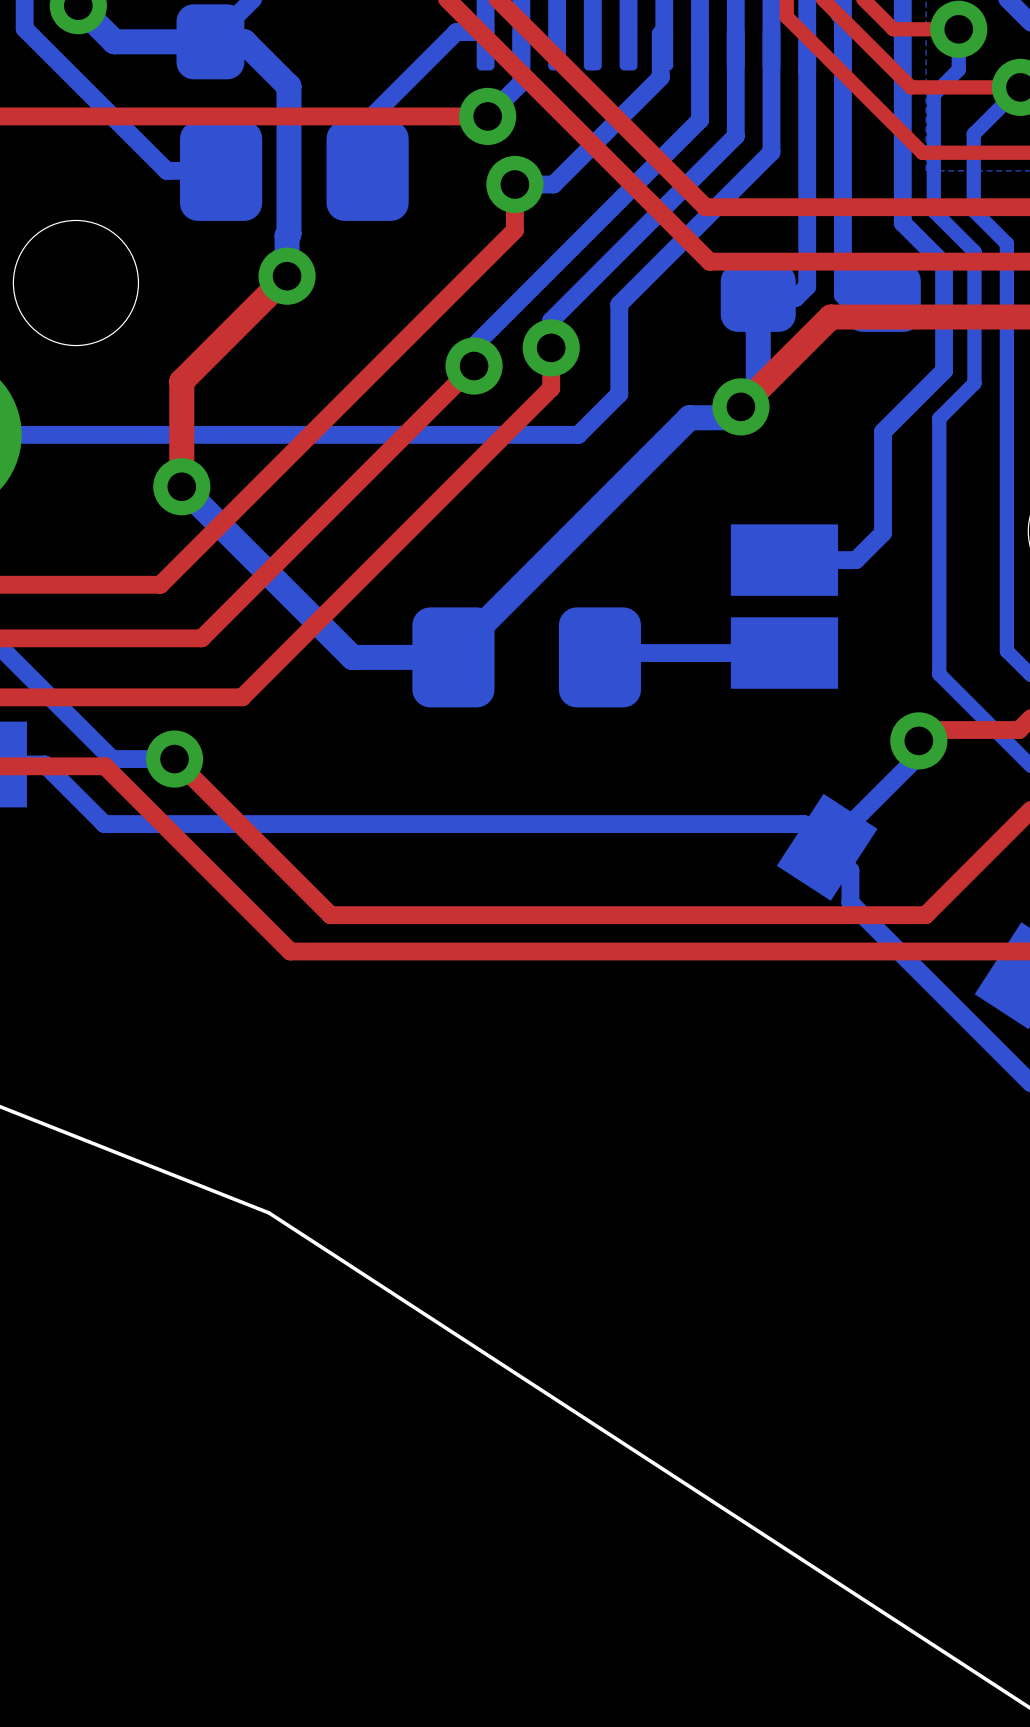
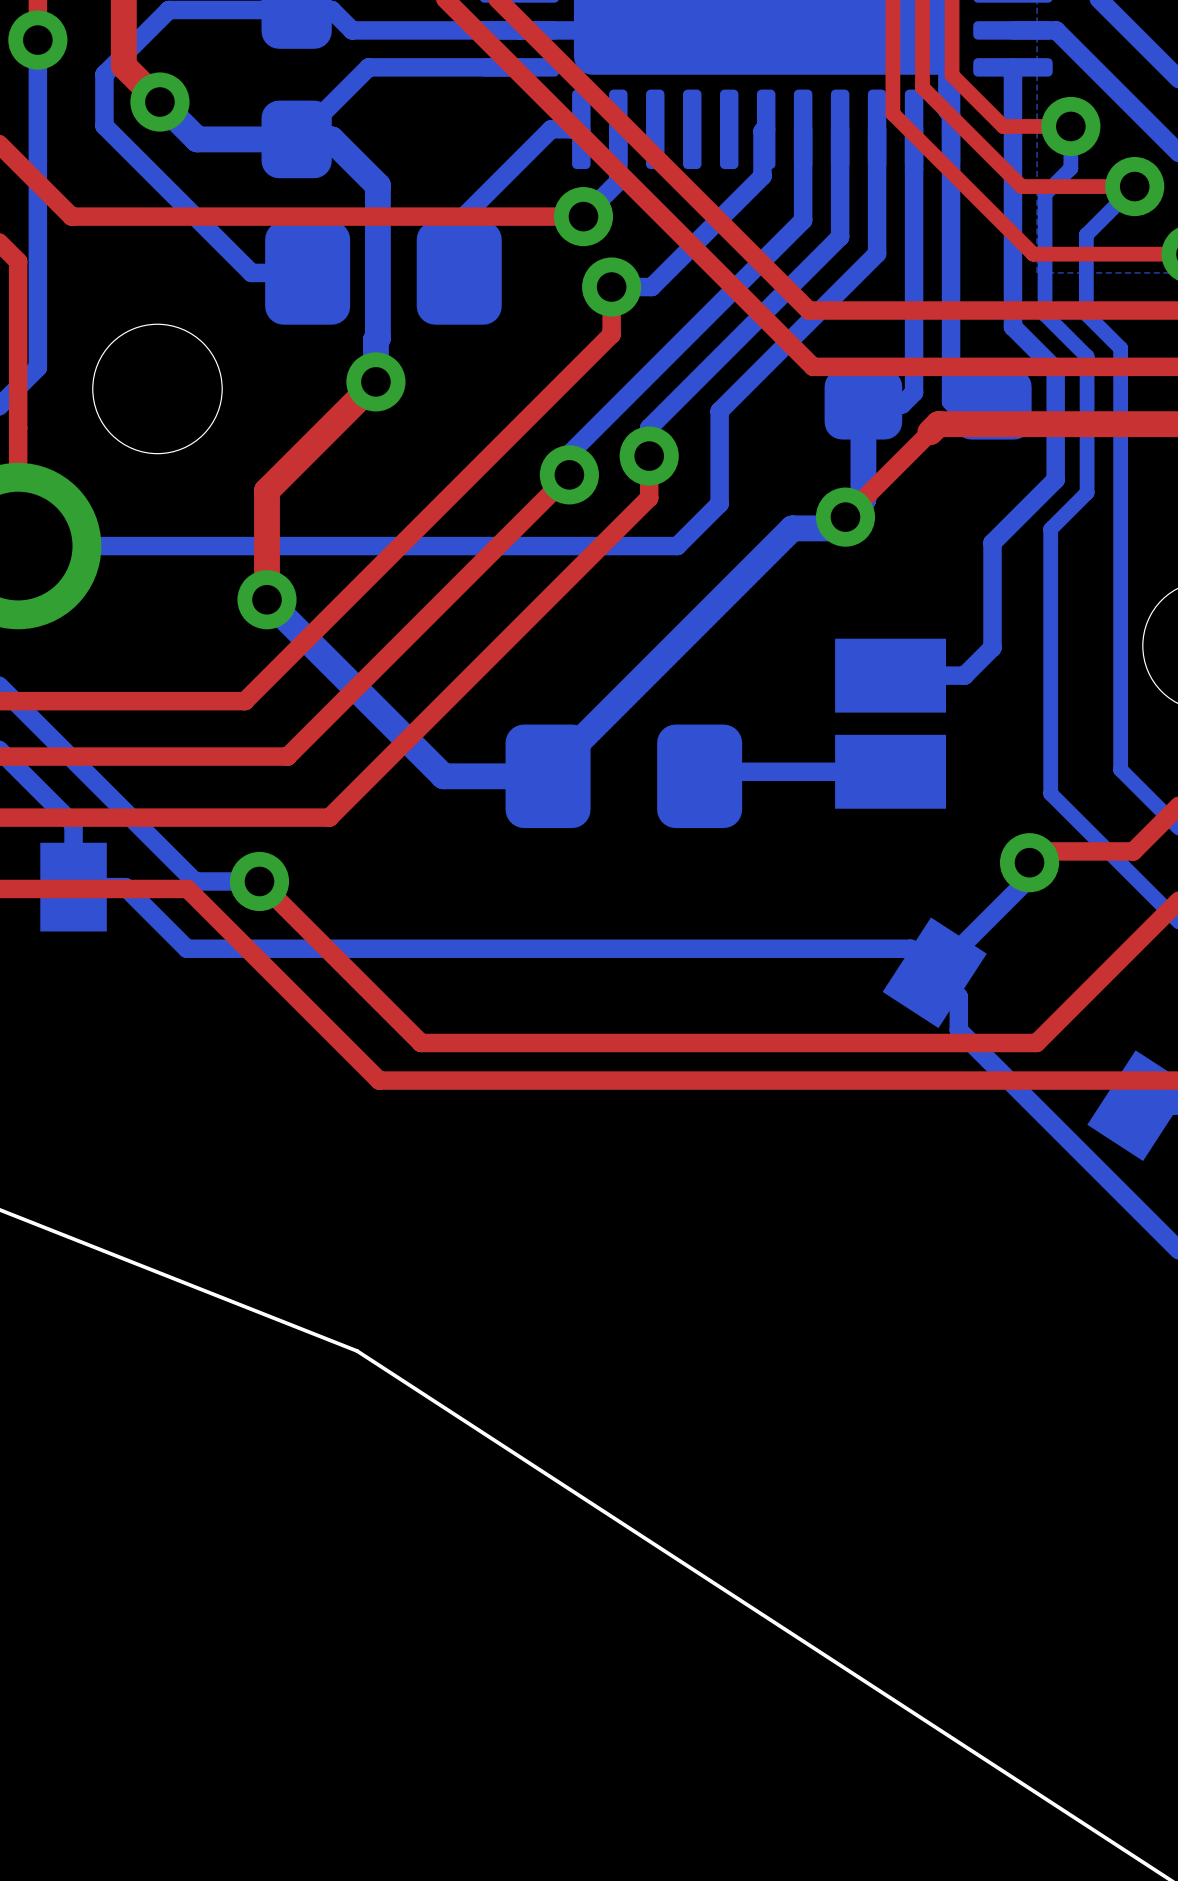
top track width: thick (822, 324) (740, 406) -> thin (930, 432) (845, 517)

